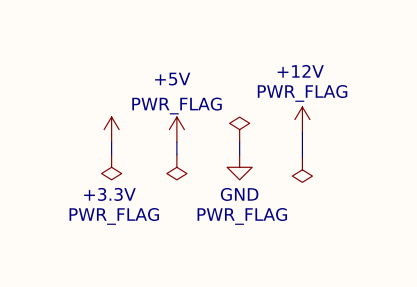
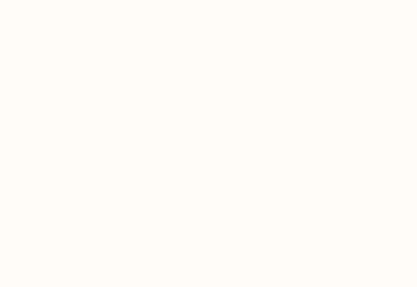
power symbol: +12V (302, 119) -> none
power symbol: +3.3V (111, 129) -> none
power symbol: +5V (176, 129) -> none
power symbol: PWR_FLAG (239, 129) -> none
wire: (302, 132) (302, 157) -> none
wire: (111, 142) (111, 154) -> none
wire: (176, 142) (176, 154) -> none
wire: (239, 142) (239, 154) -> none
power symbol: PWR_FLAG (111, 167) -> none
power symbol: PWR_FLAG (176, 167) -> none
power symbol: GND (239, 167) -> none
power symbol: PWR_FLAG (302, 169) -> none

